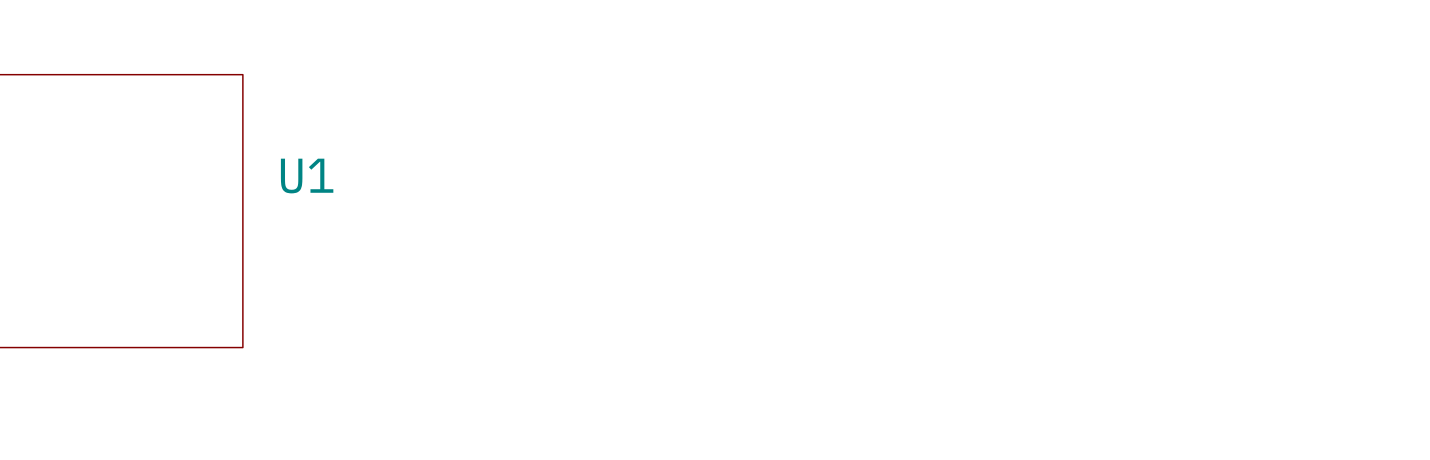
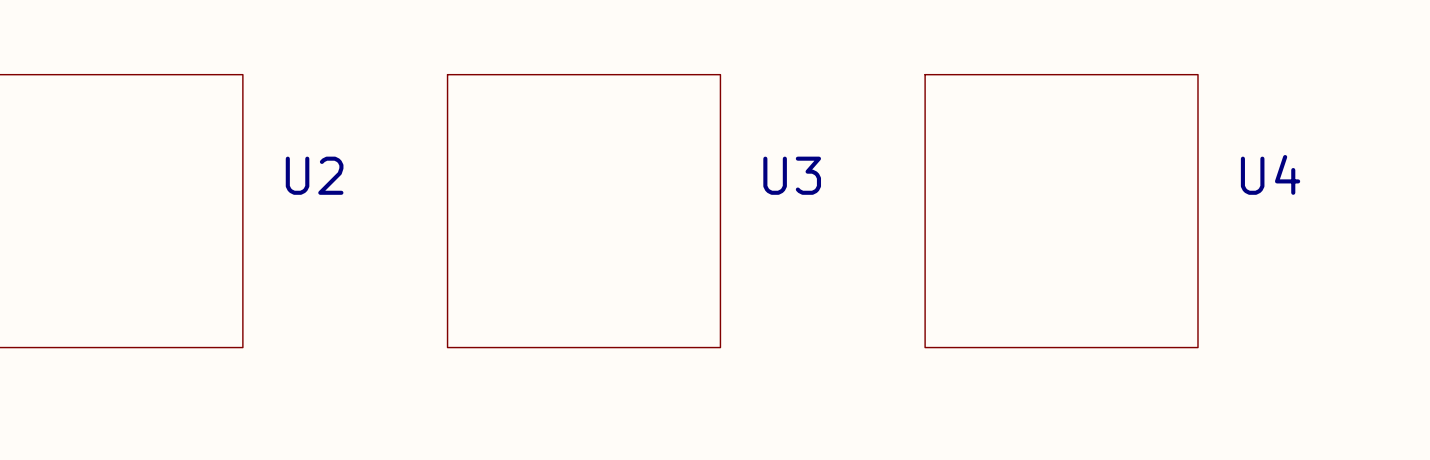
U1 name: U1 (307, 176) -> U2 (314, 175)
U3: none -> (583, 211)
U4: none -> (1061, 211)

